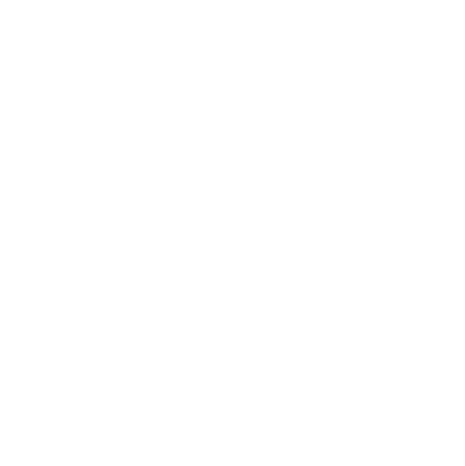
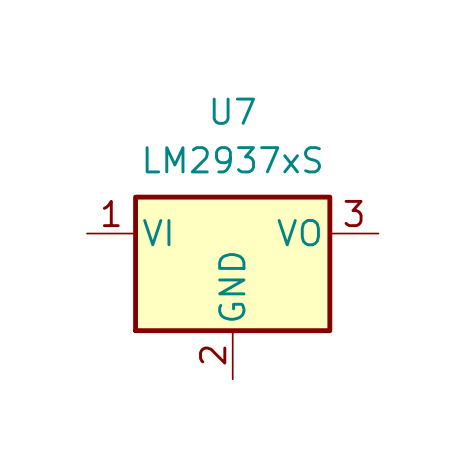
U7: none -> LM2937xS (232, 286)

